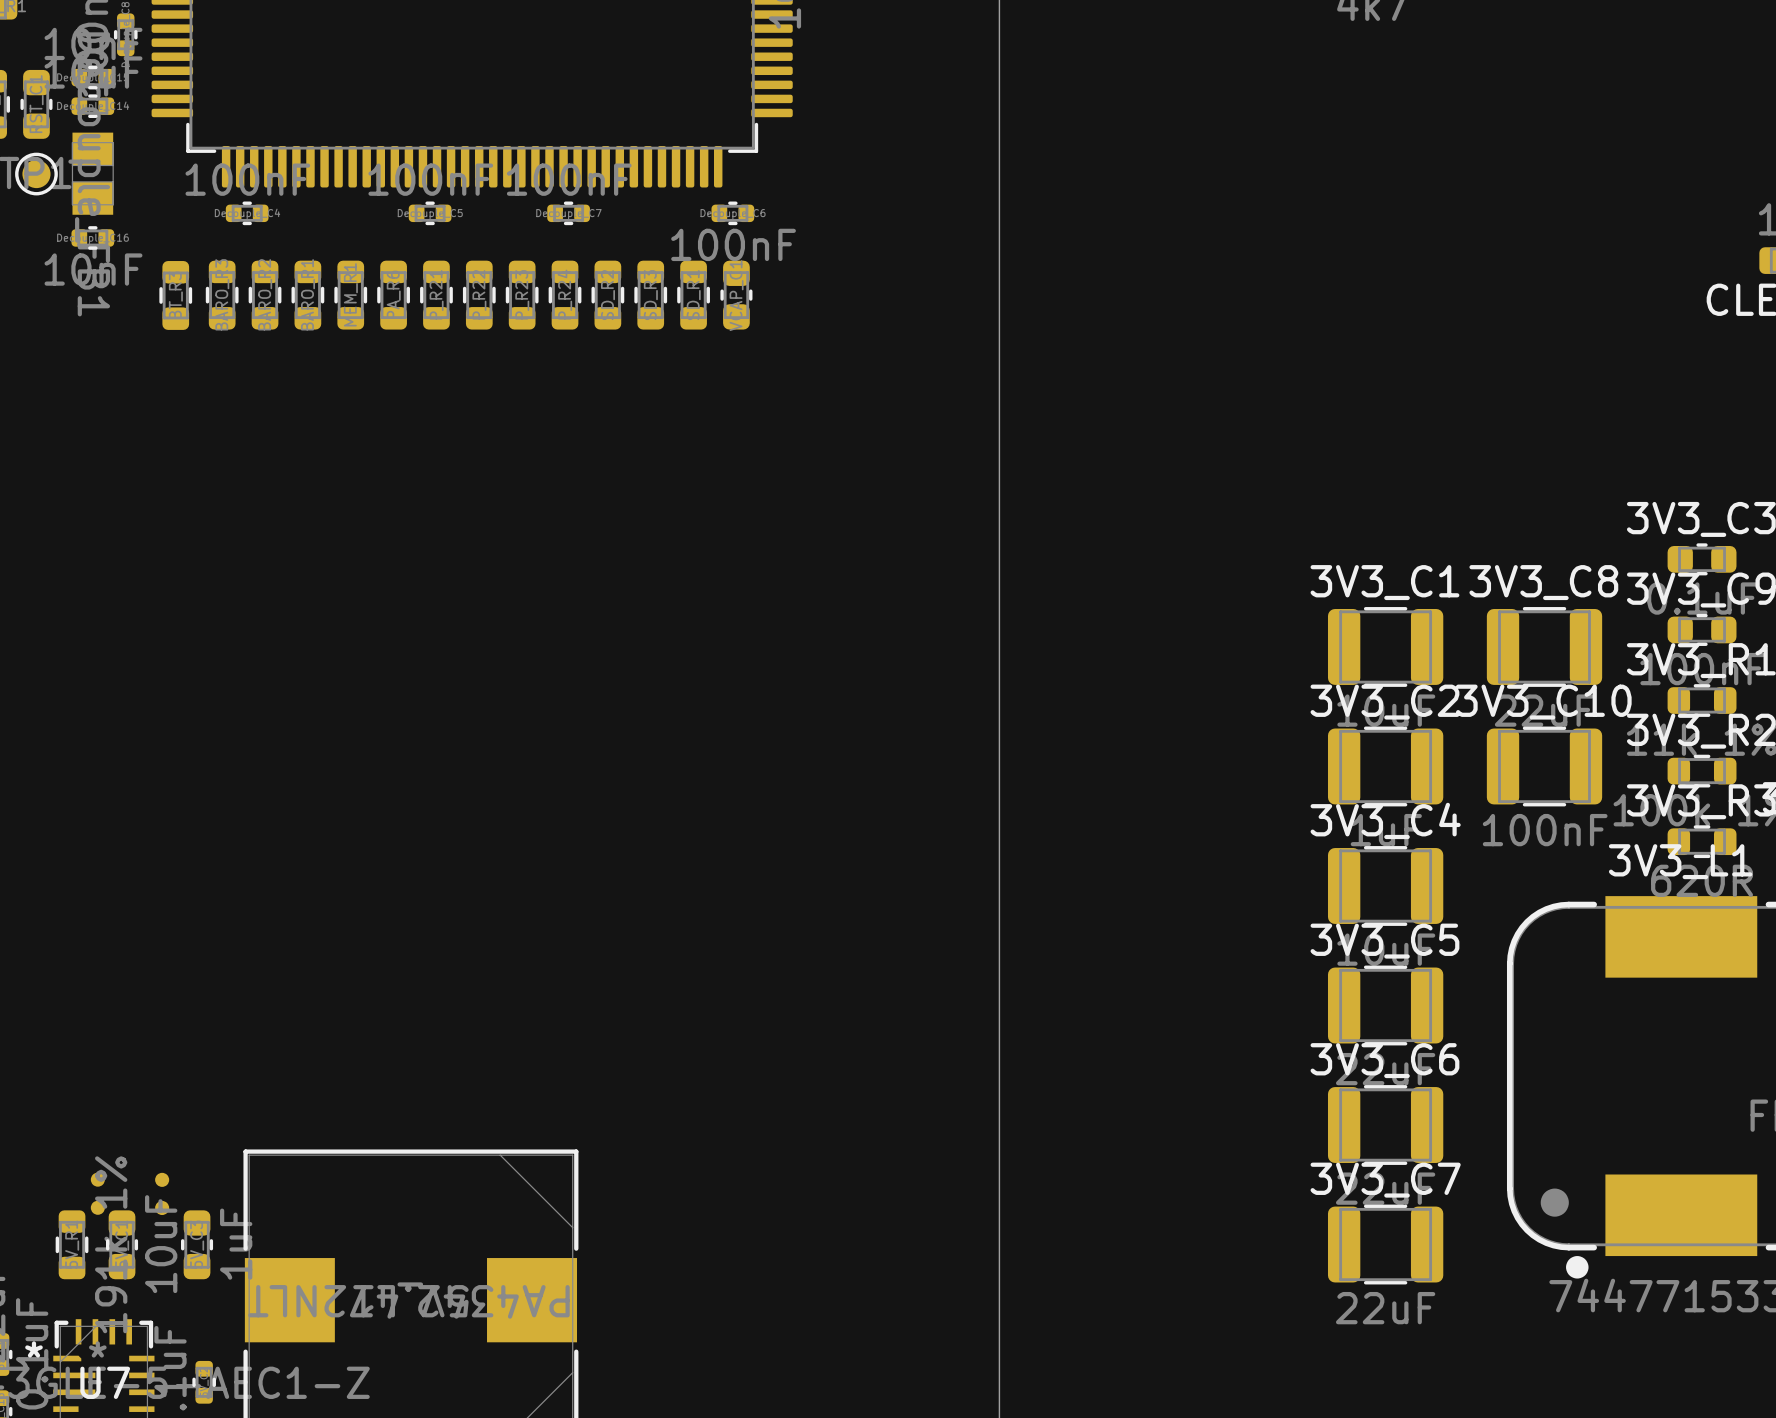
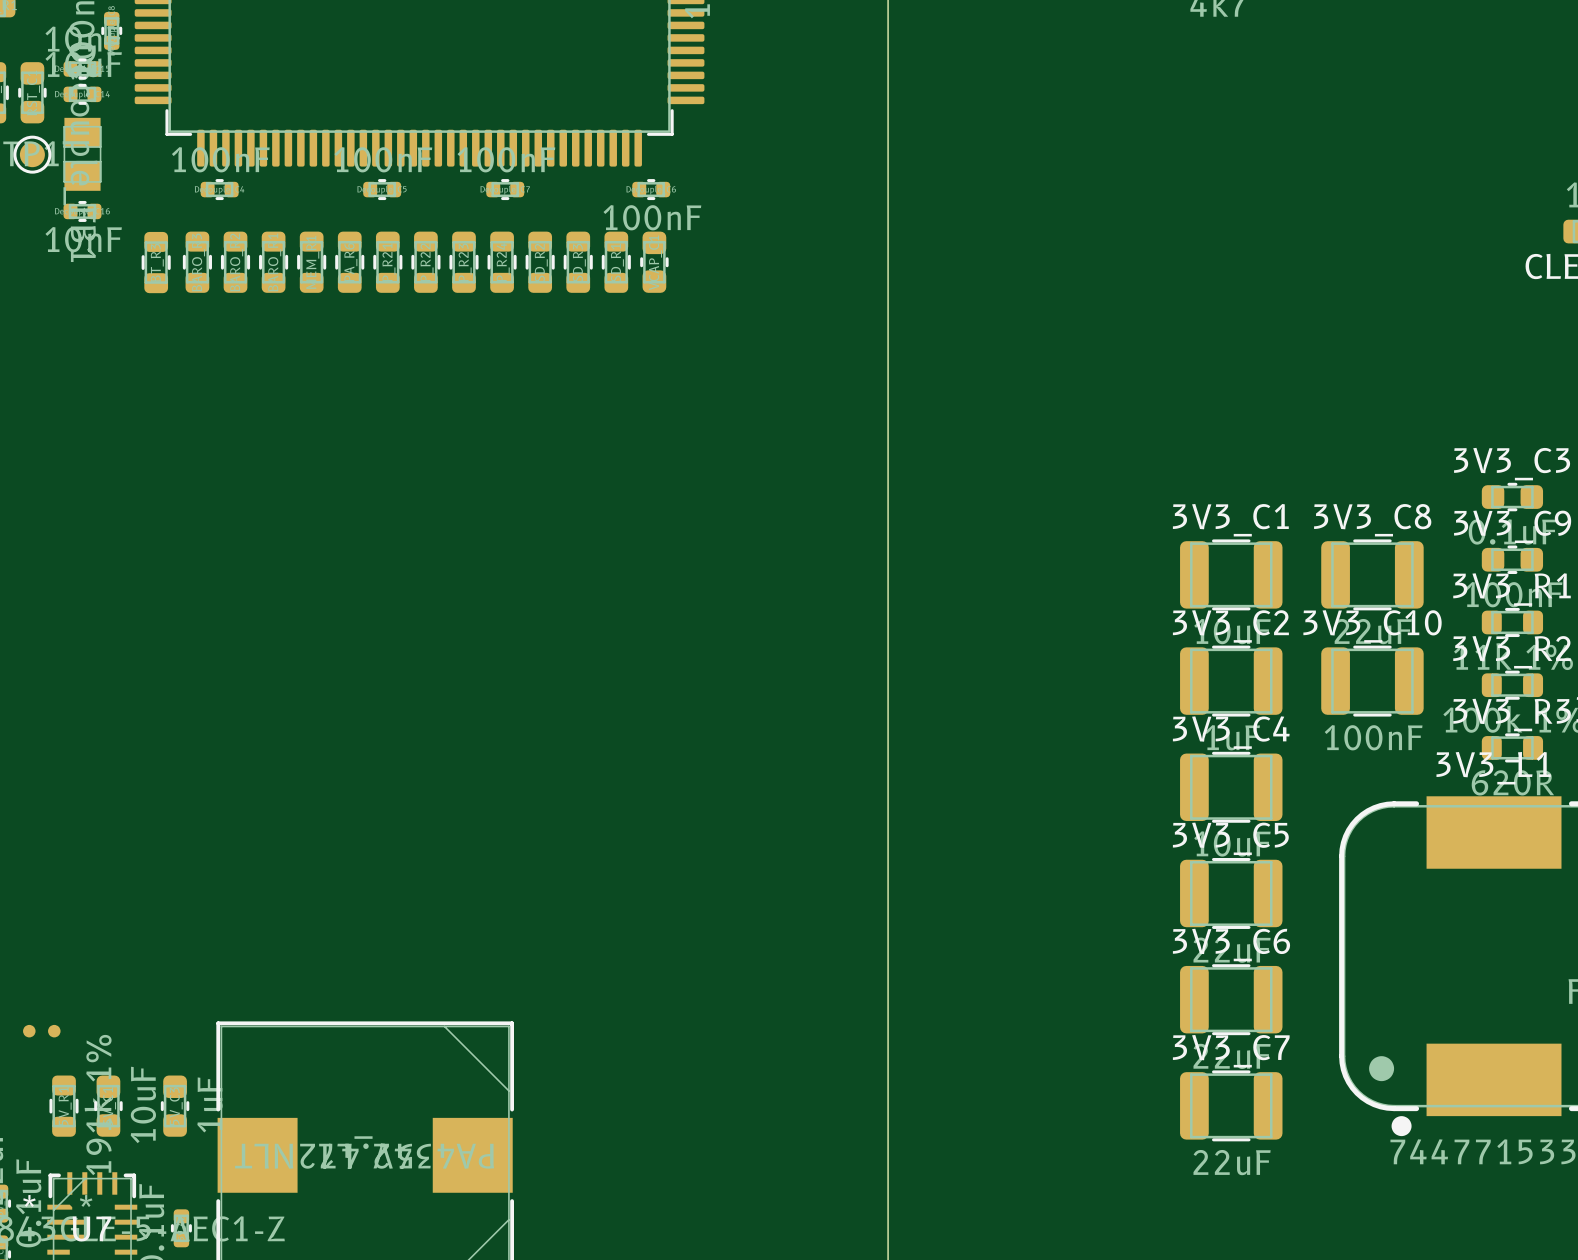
part: none -> (41, 1031)
part: (97, 1193) -> none
part: (162, 1193) -> none

